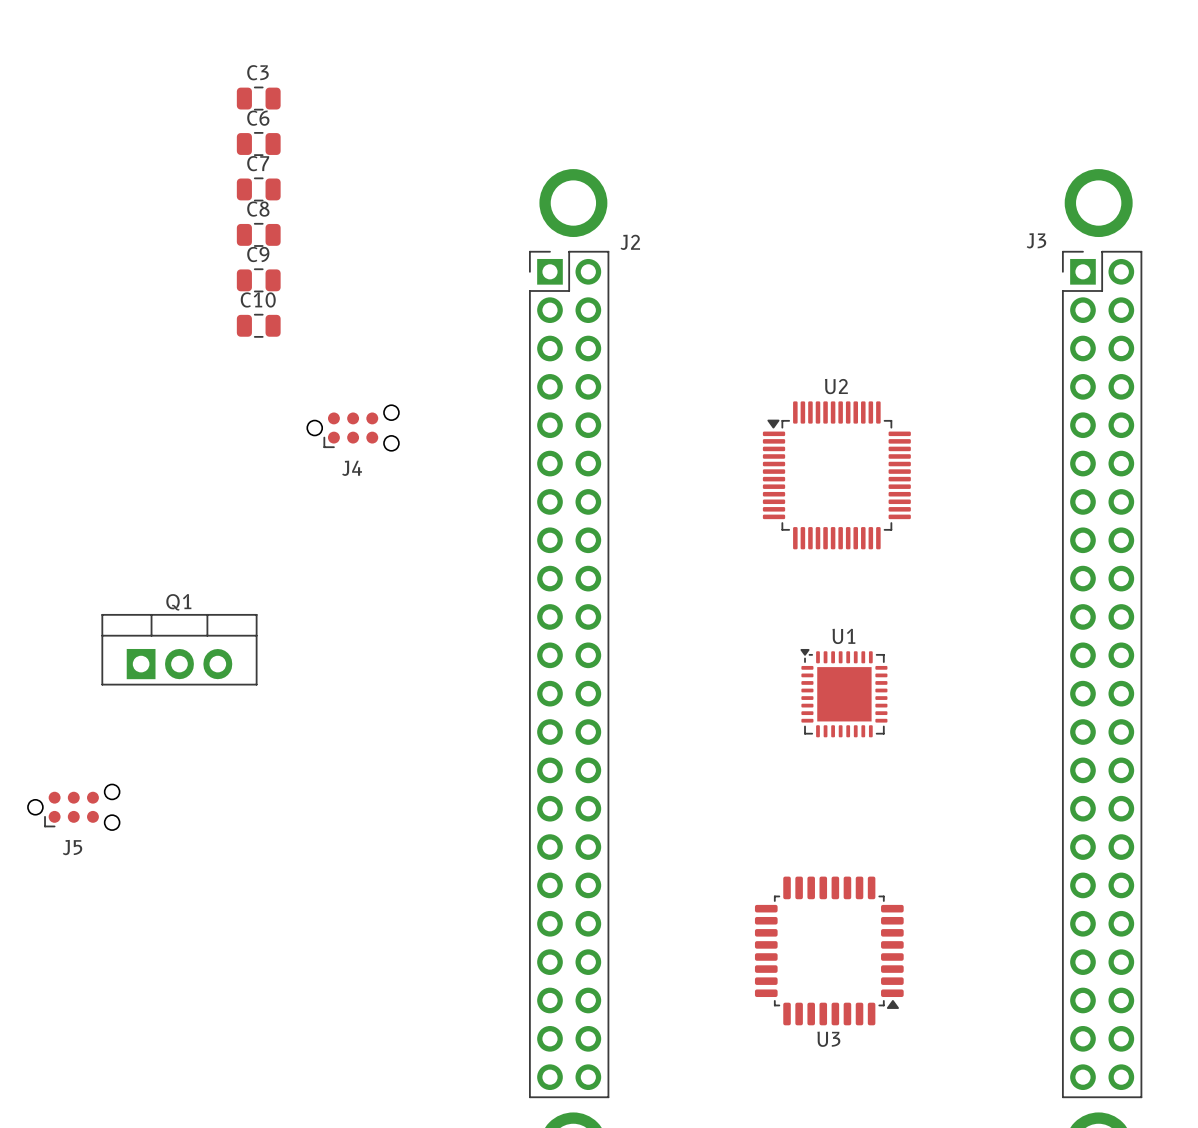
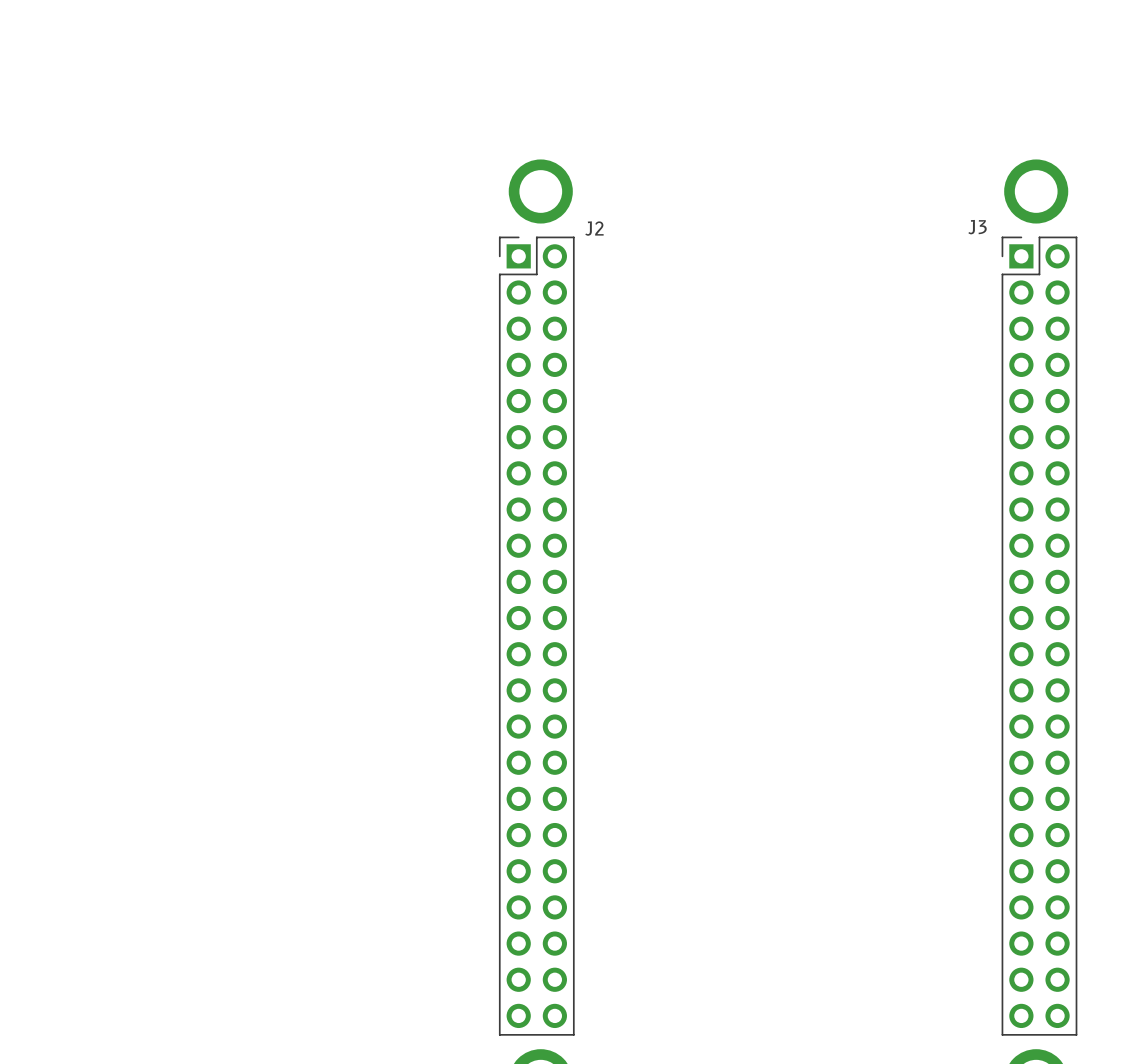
C3: (258, 98) -> none
C6: (258, 144) -> none
C7: (258, 189) -> none
C8: (258, 234) -> none
C9: (258, 280) -> none
C10: (258, 325) -> none
J4: (353, 428) -> none
U2: (836, 475) -> none
Q1: (179, 649) -> none
U1: (843, 693) -> none
J5: (73, 807) -> none
U3: (829, 950) -> none

